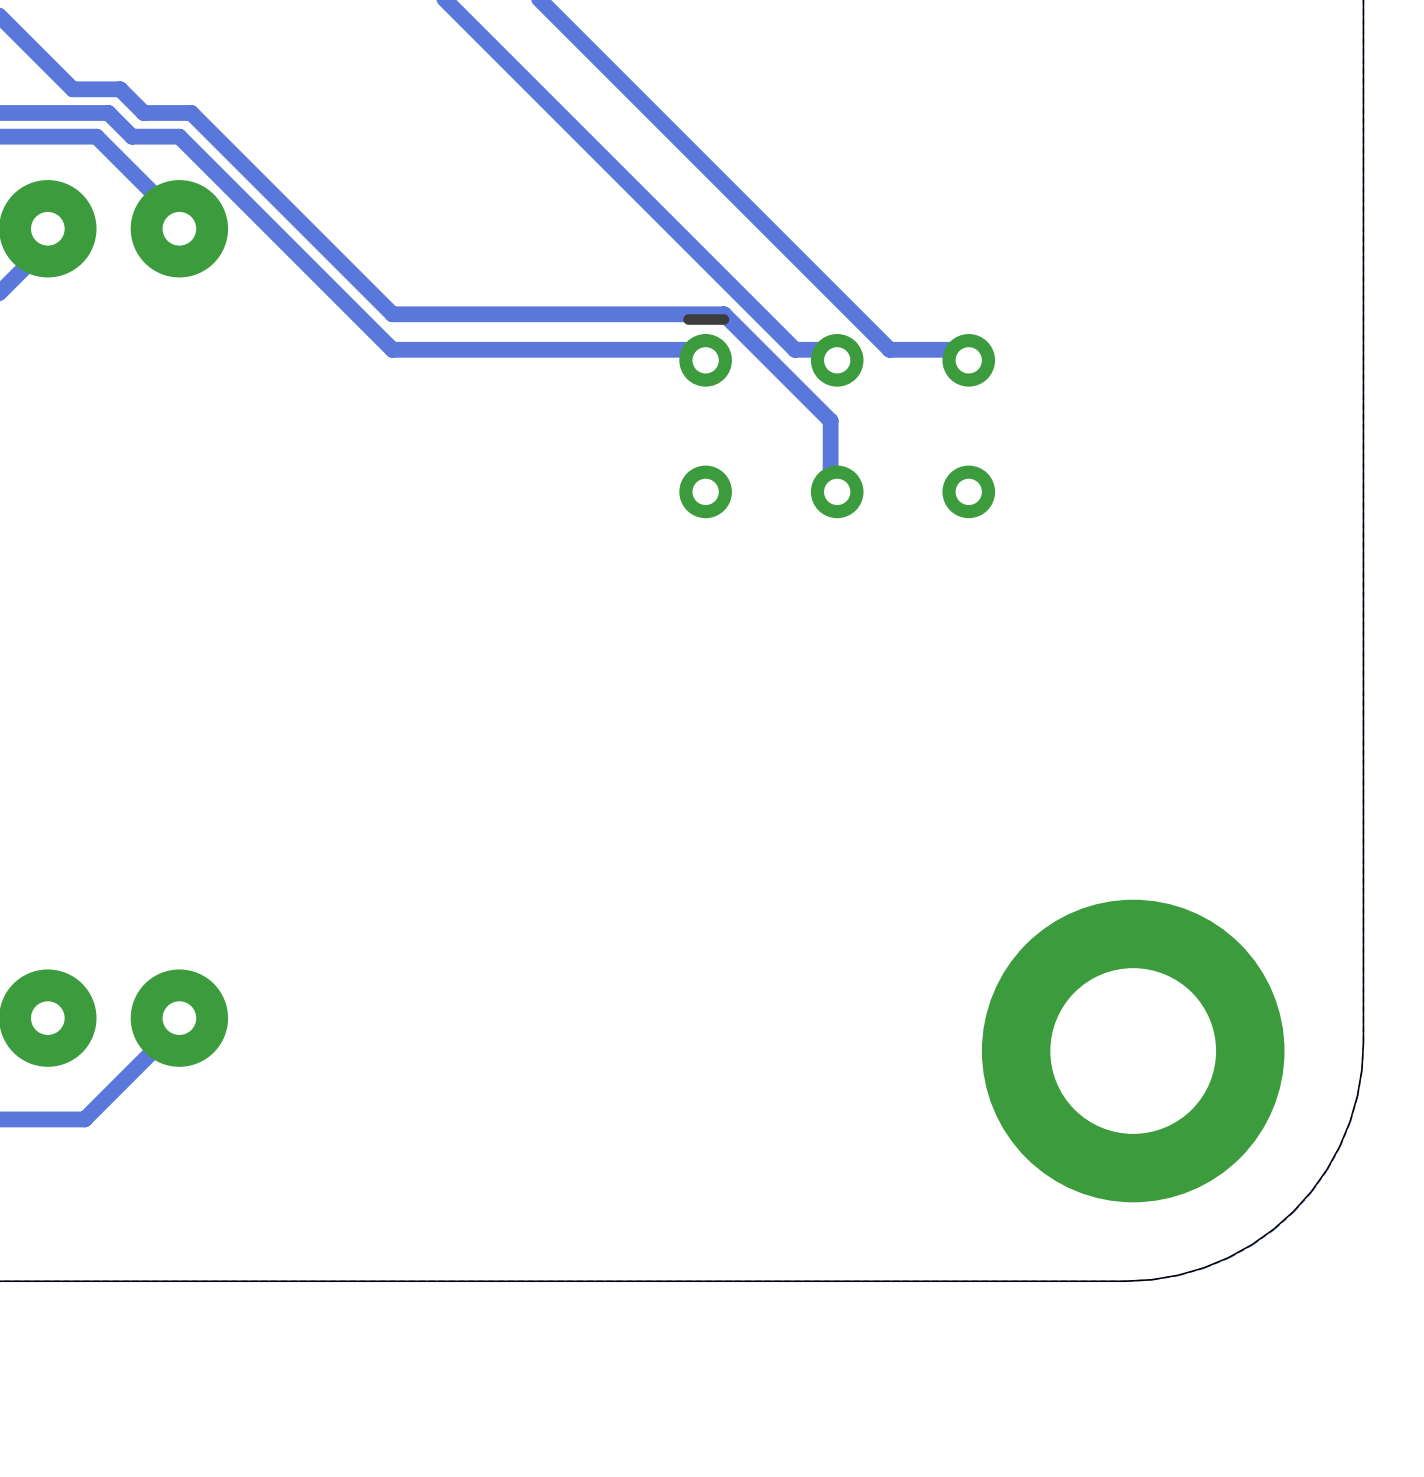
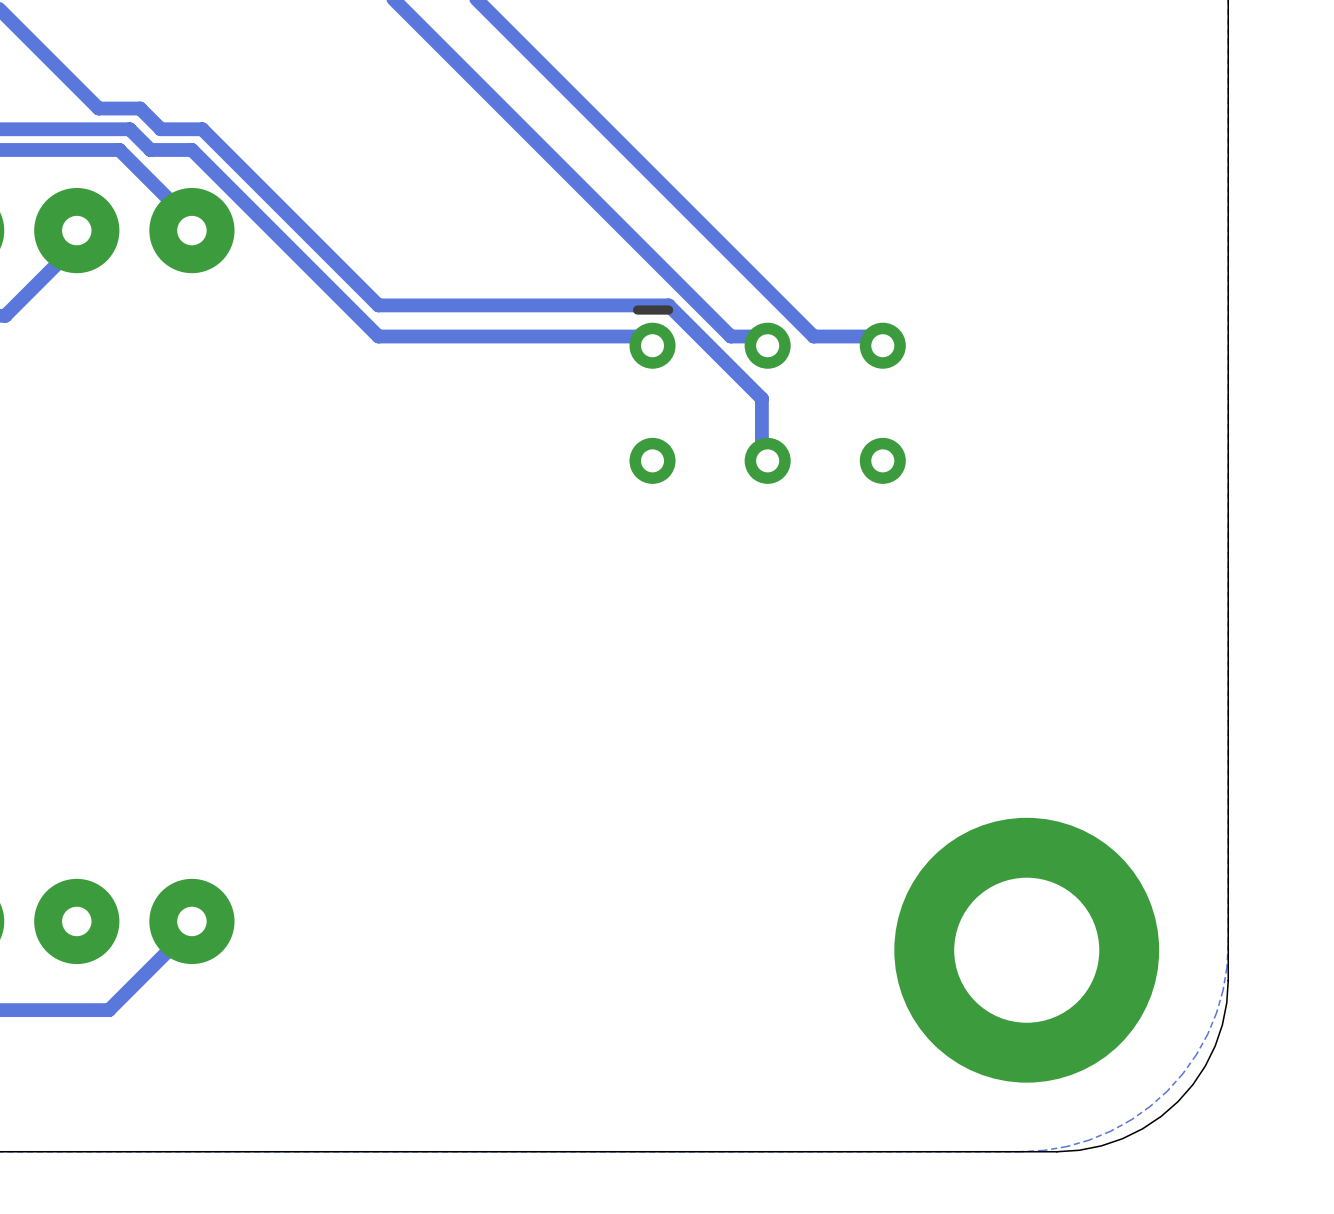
board edge: (1363, 1042) (1361, 1069) (1350, 1121) (1326, 1169) (1293, 1211) (1251, 1244) (1203, 1267) (1151, 1279) (1124, 1281) -> (1228, 943) (1226, 1002) (1222, 1024) (1205, 1066) (1178, 1101) (1142, 1128) (1101, 1145) (1079, 1150) (1019, 1151)

